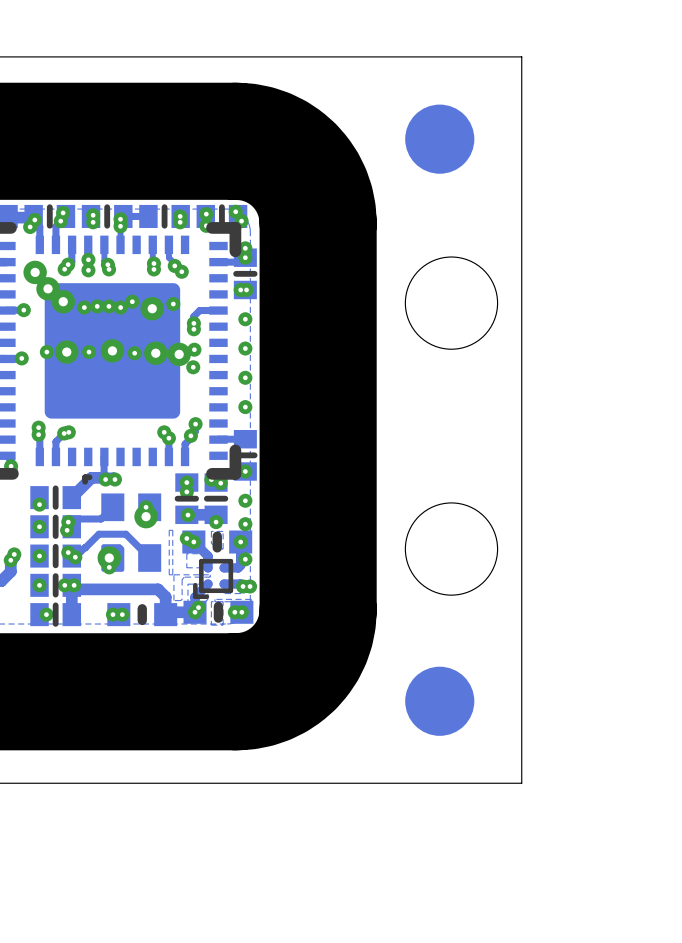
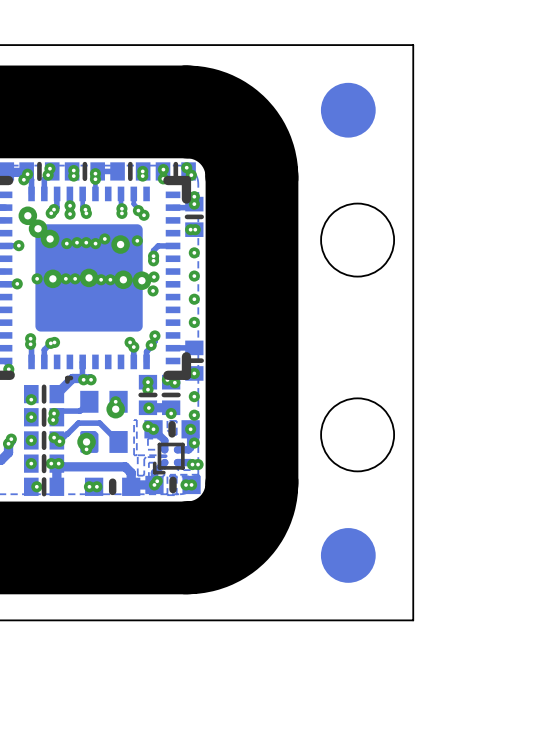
via: none -> (65, 278)
via: (89, 352) -> none
via: none -> (75, 278)
via: none -> (101, 279)
via: (134, 353) -> none
via: none -> (110, 279)

